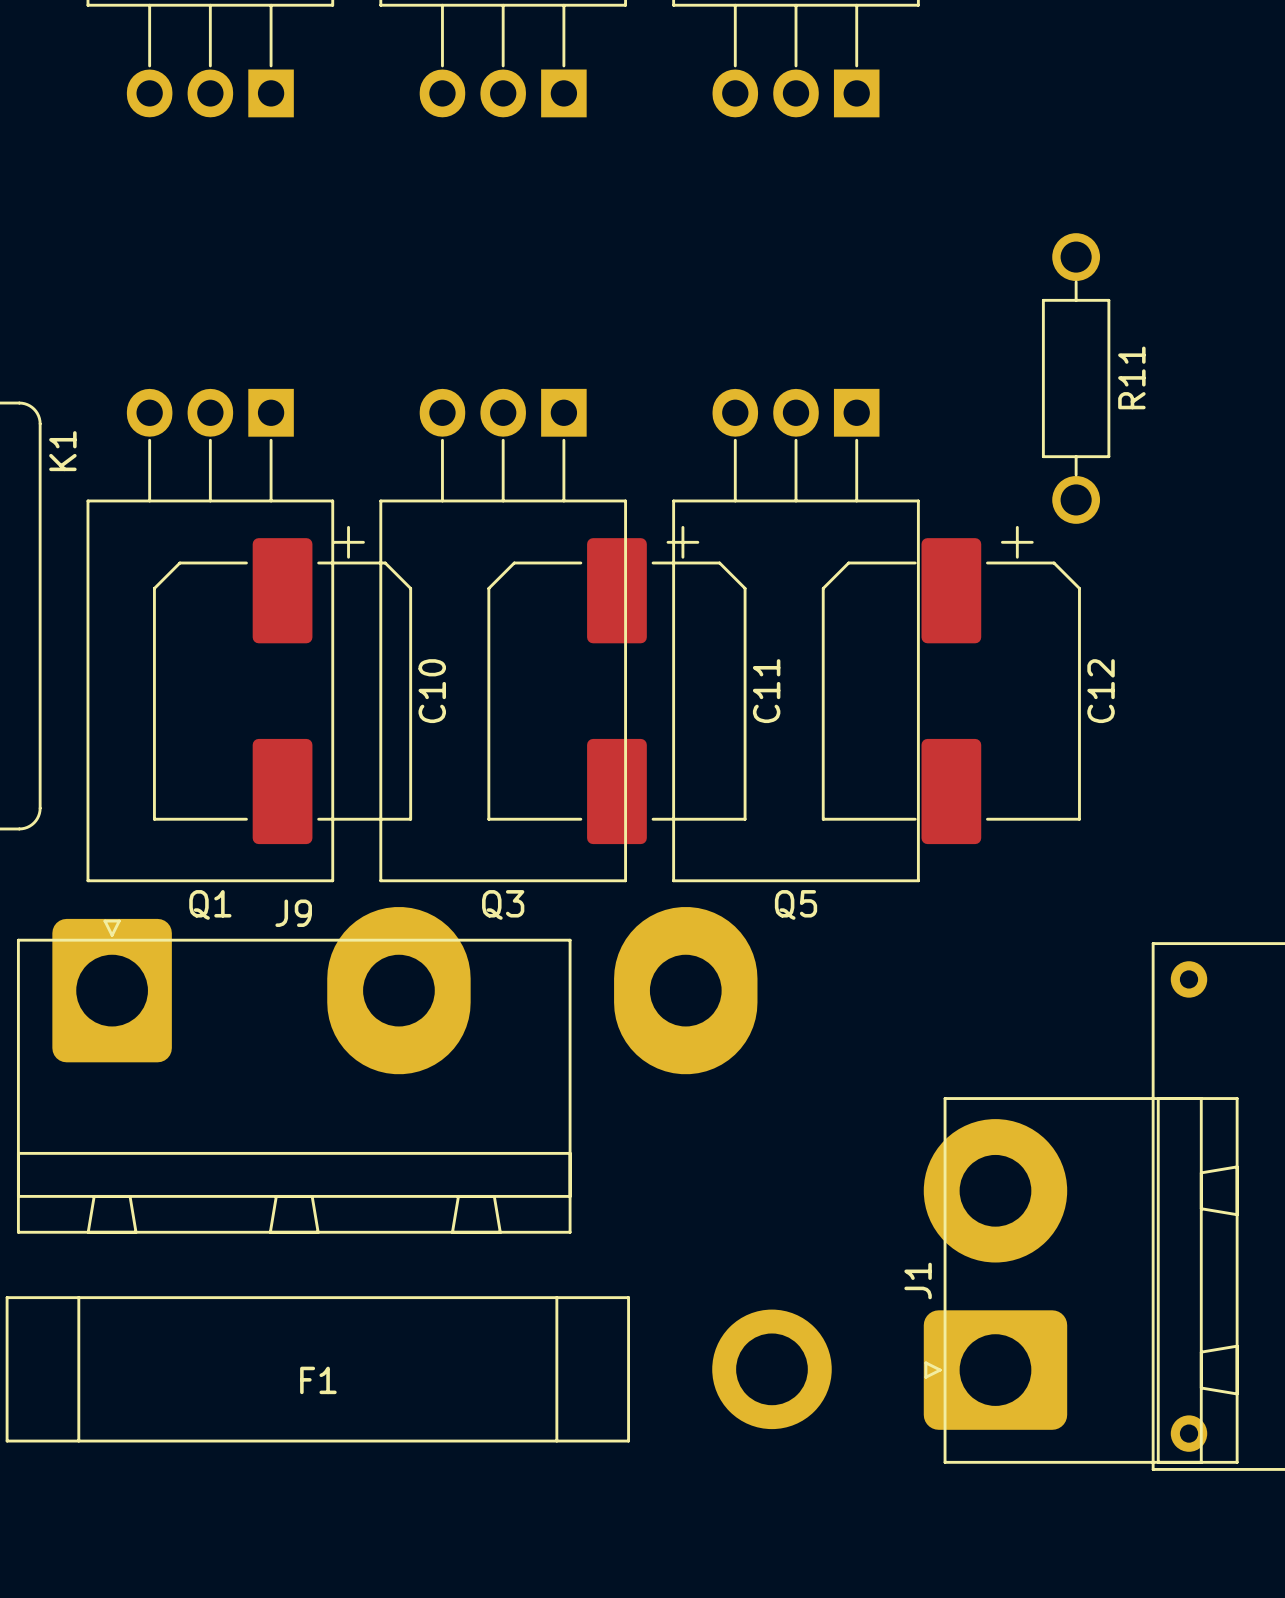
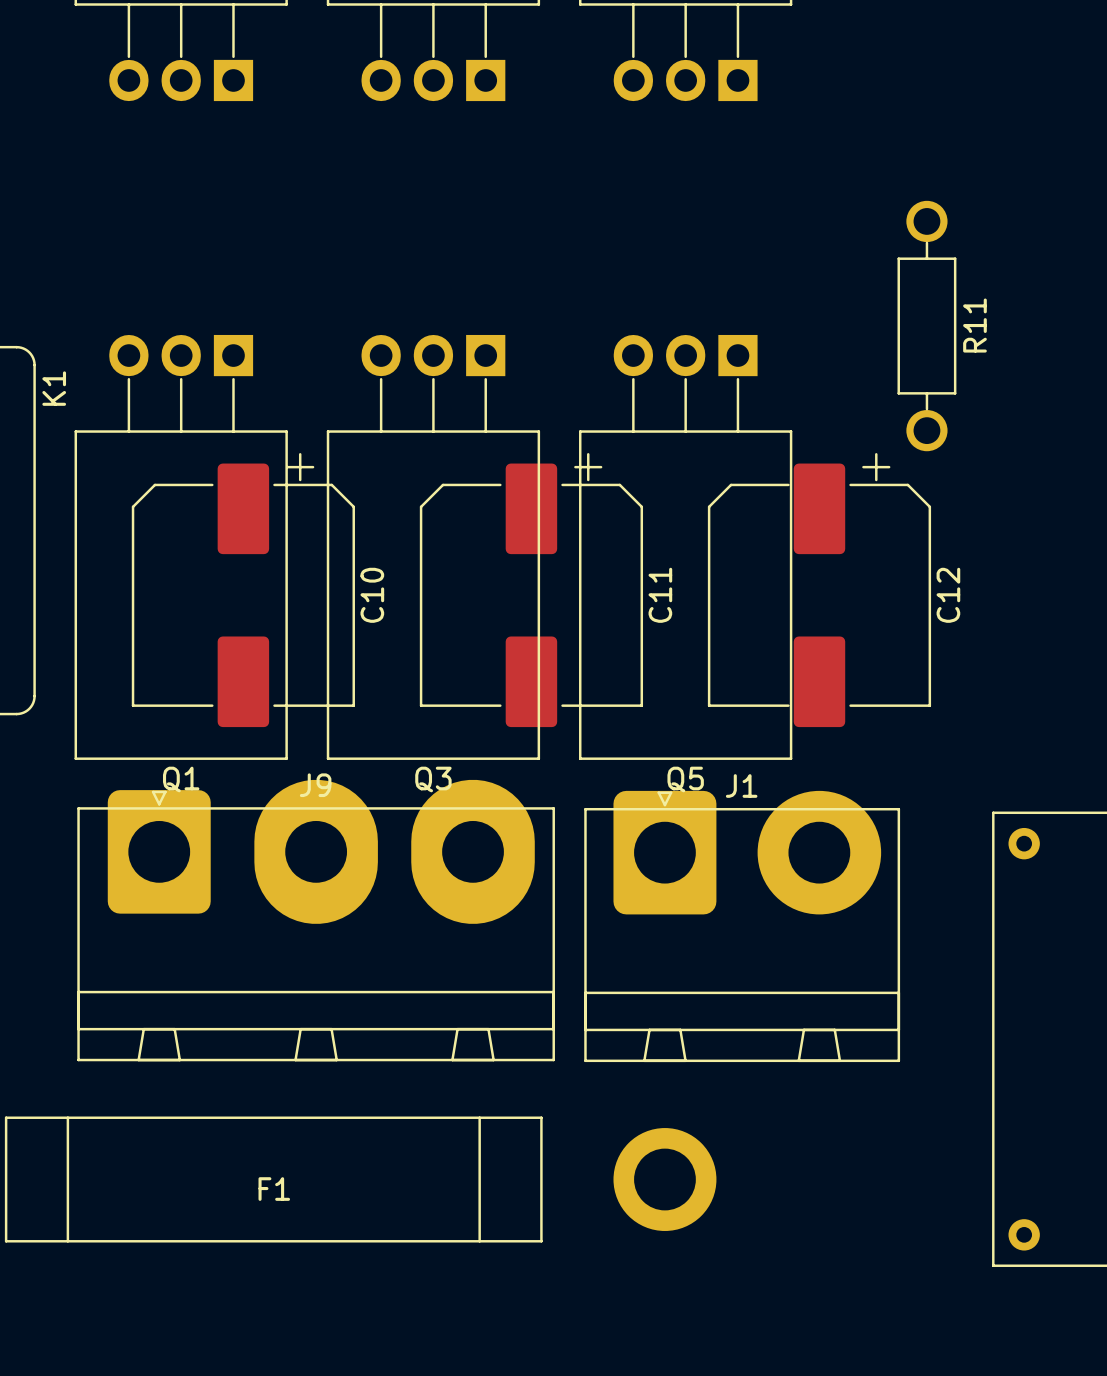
J9 footprint: [16, 906, 758, 1234] -> [77, 779, 555, 1062]
J9 name position: J9 (293, 913) -> J9 (315, 785)
J1 rotation: 0° (1081, 1280) -> 90° clockwise (742, 926)
J1 position: (1081, 1280) -> (742, 926)

